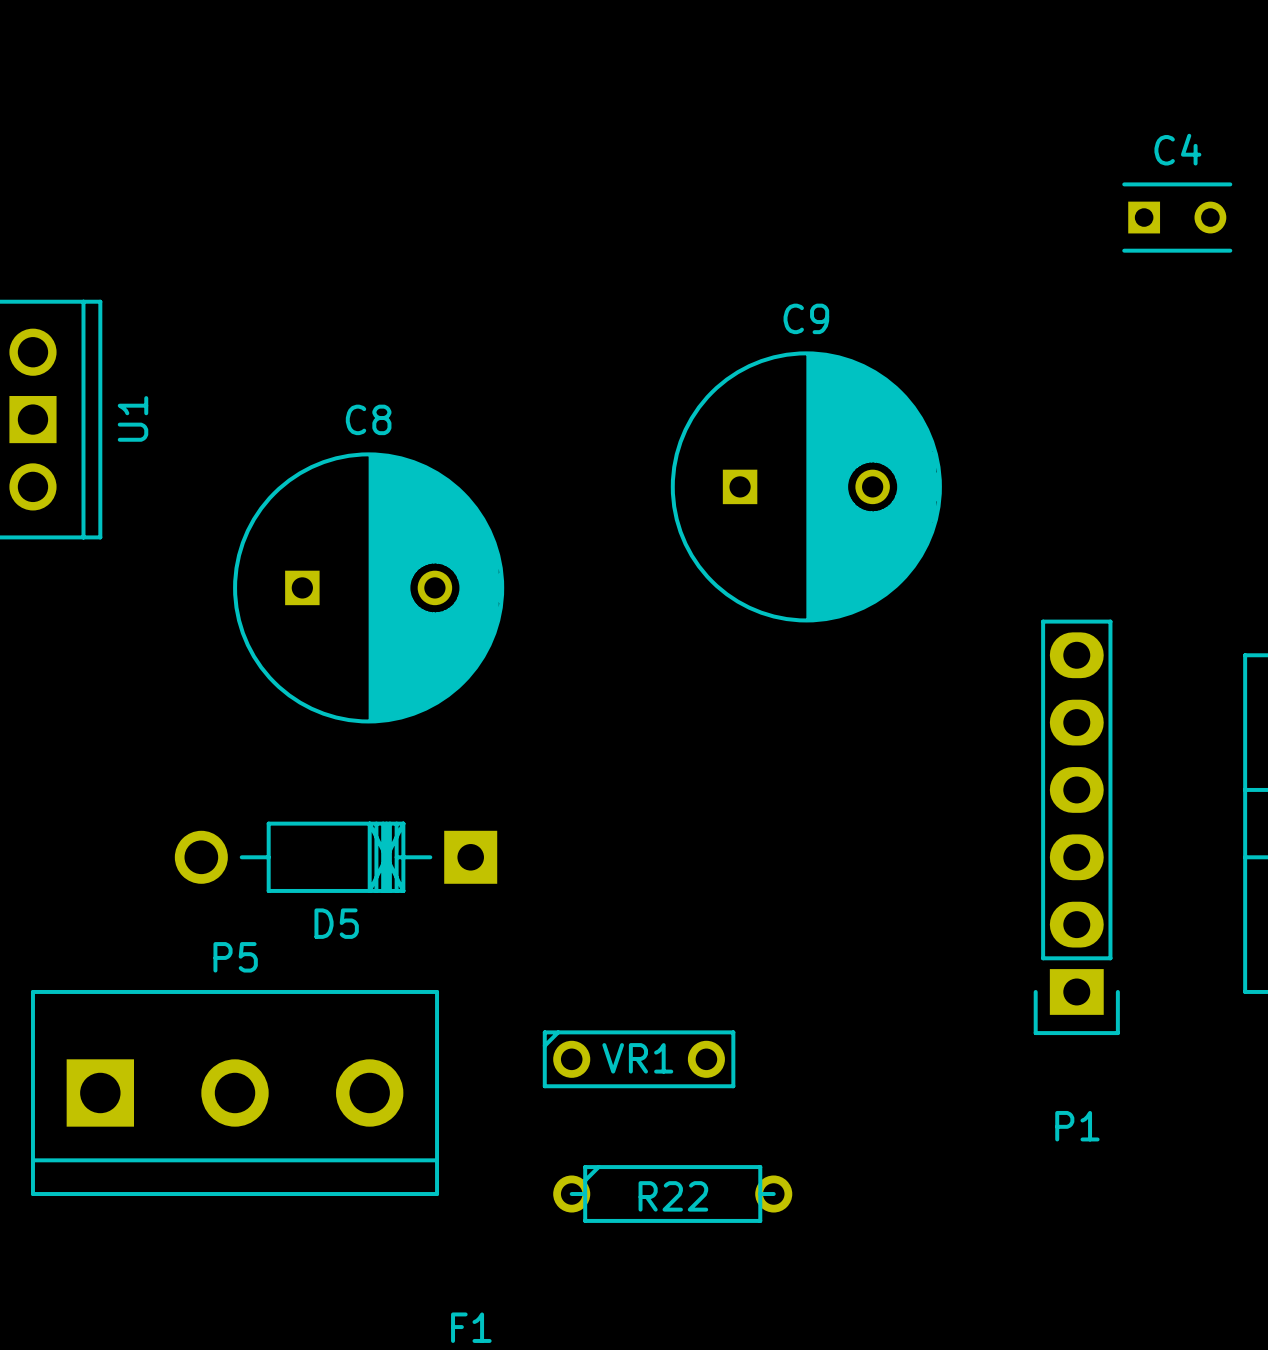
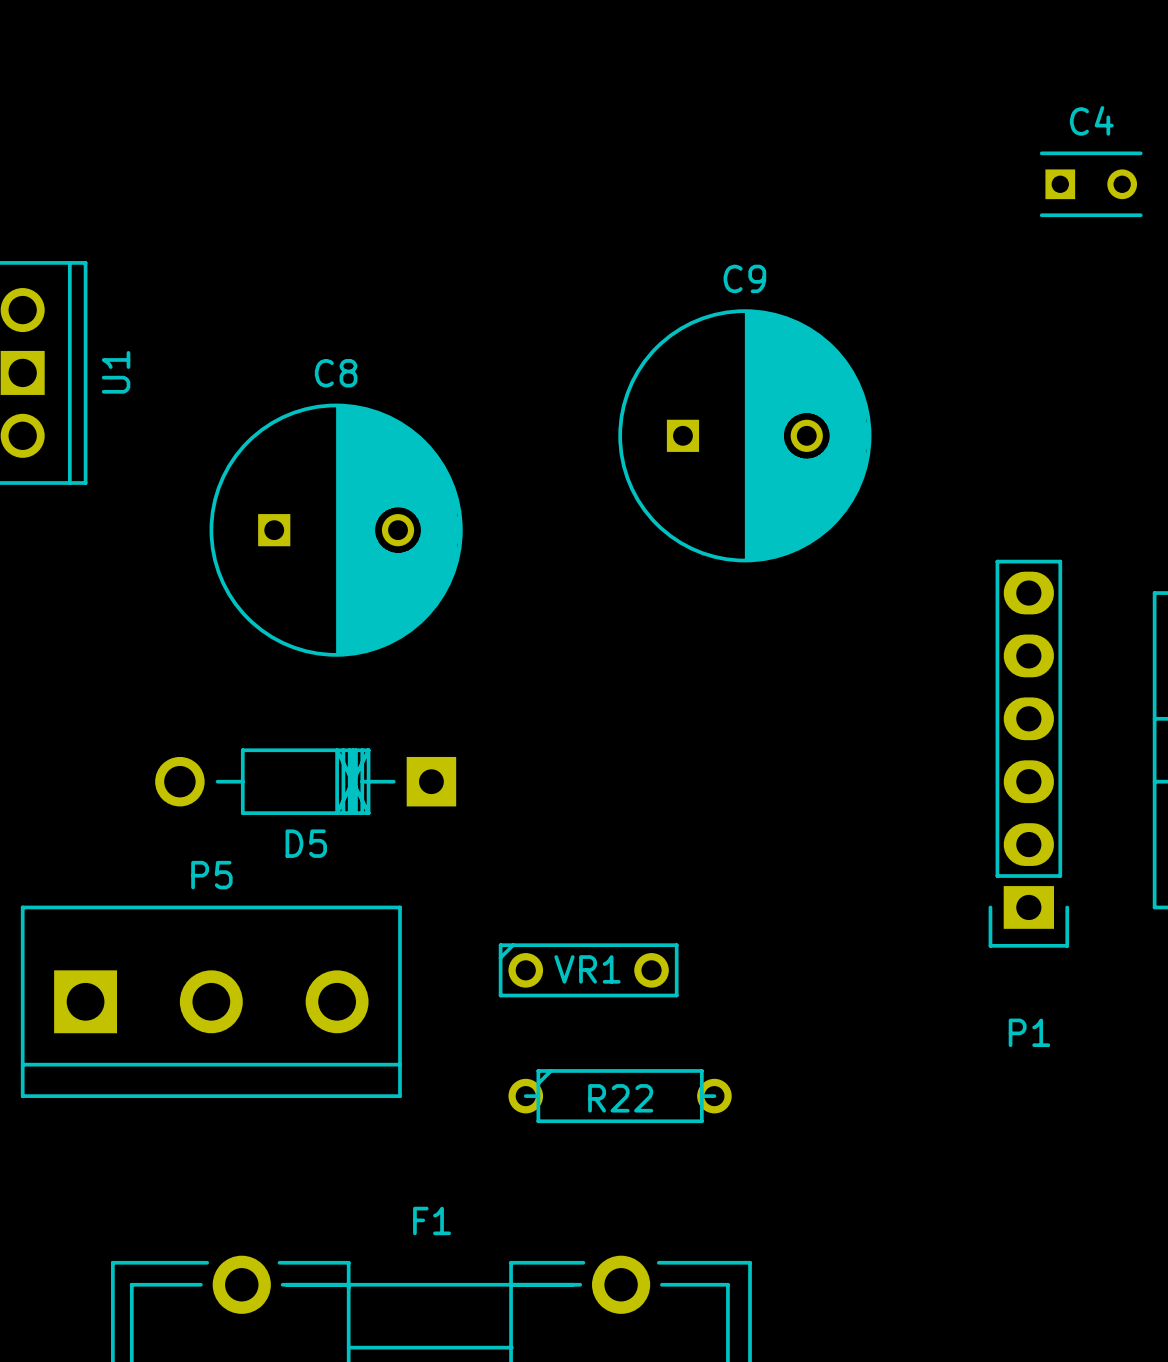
P1 position: (1076, 827) -> (1028, 753)

